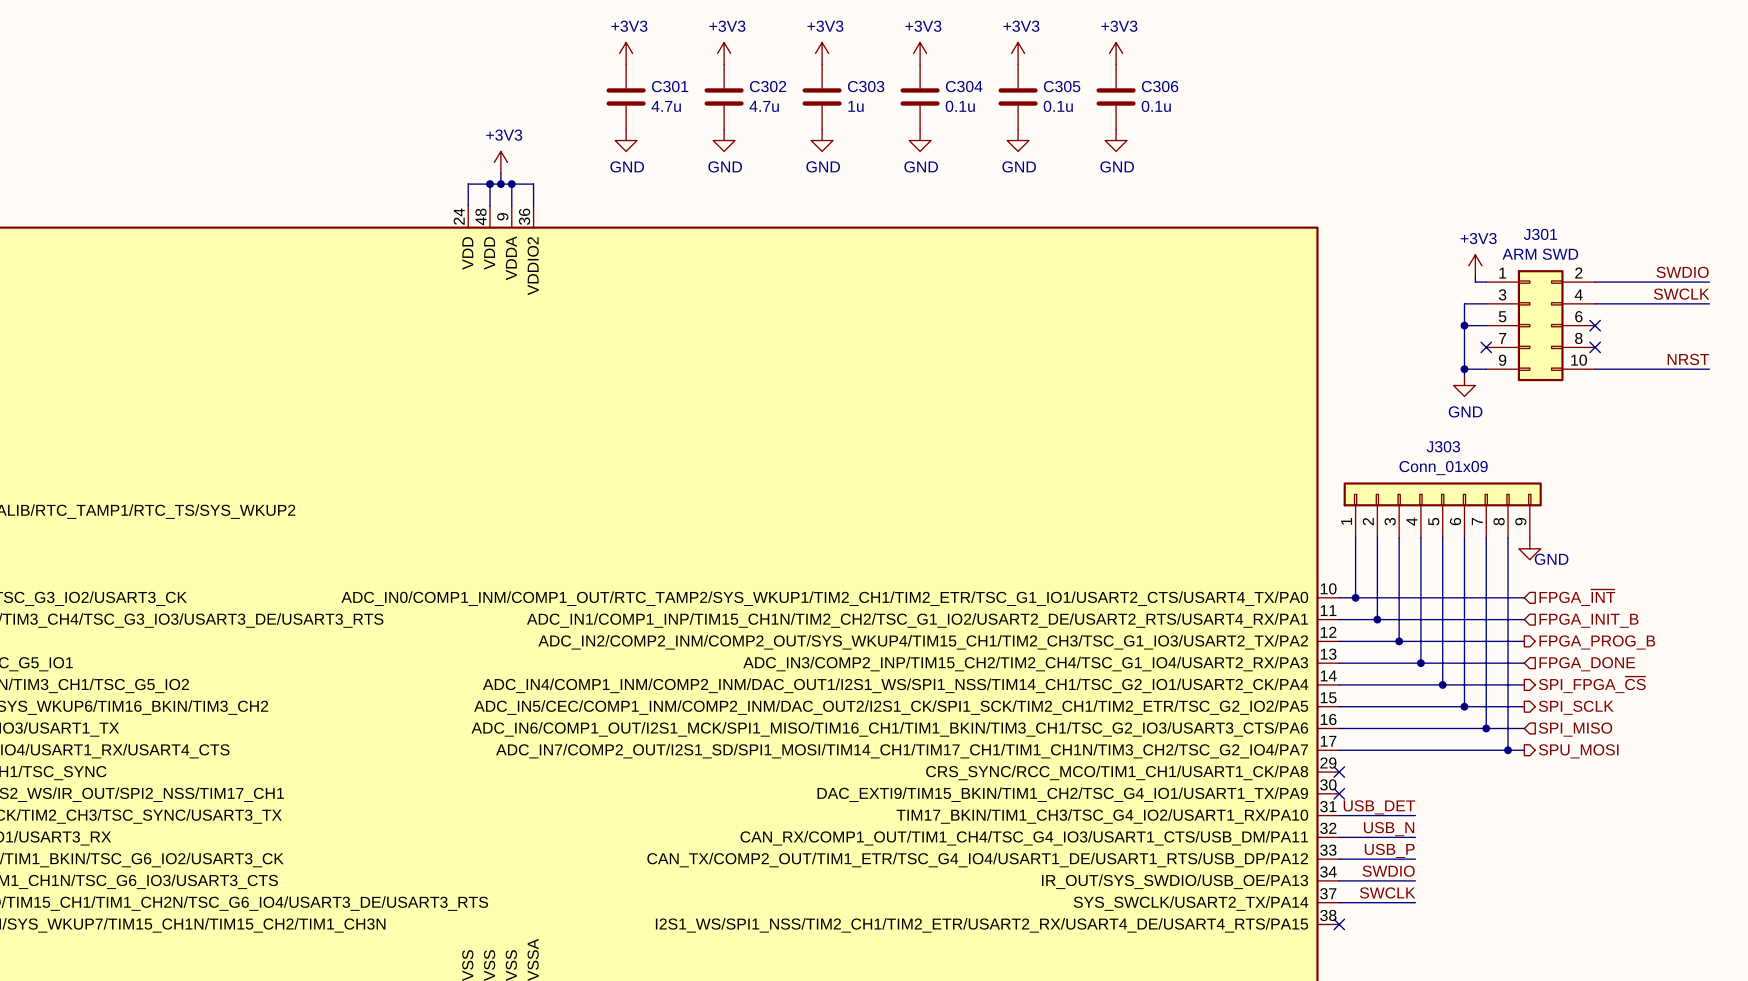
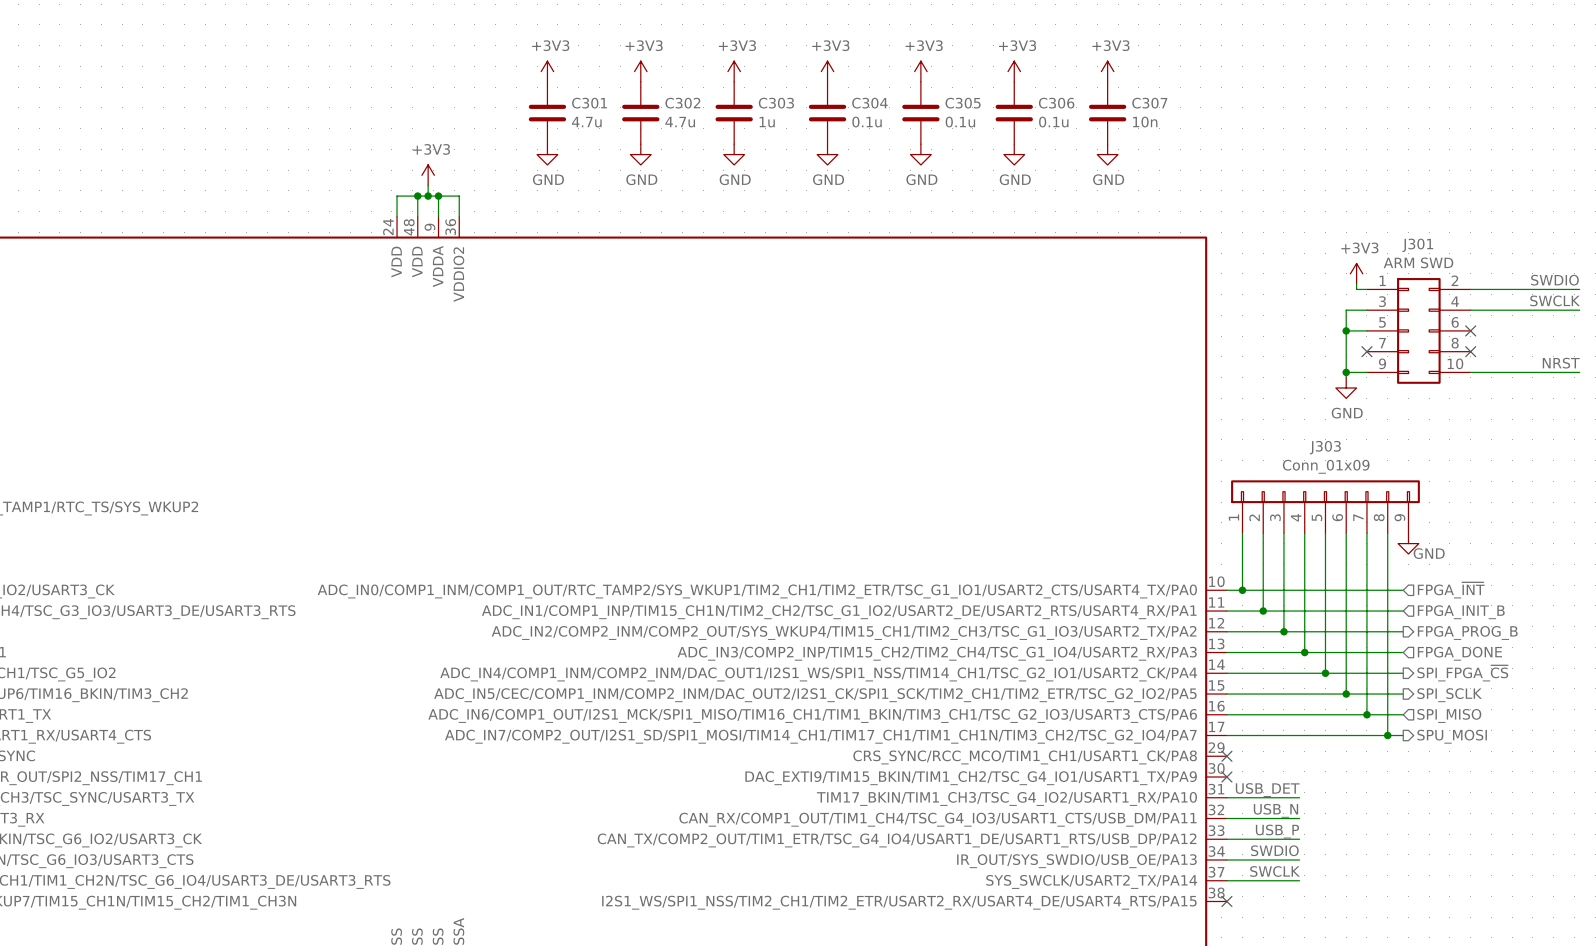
power symbol: none -> +3V3 (1107, 71)
C307: none -> 10n (1107, 113)
power symbol: none -> GND (1107, 154)

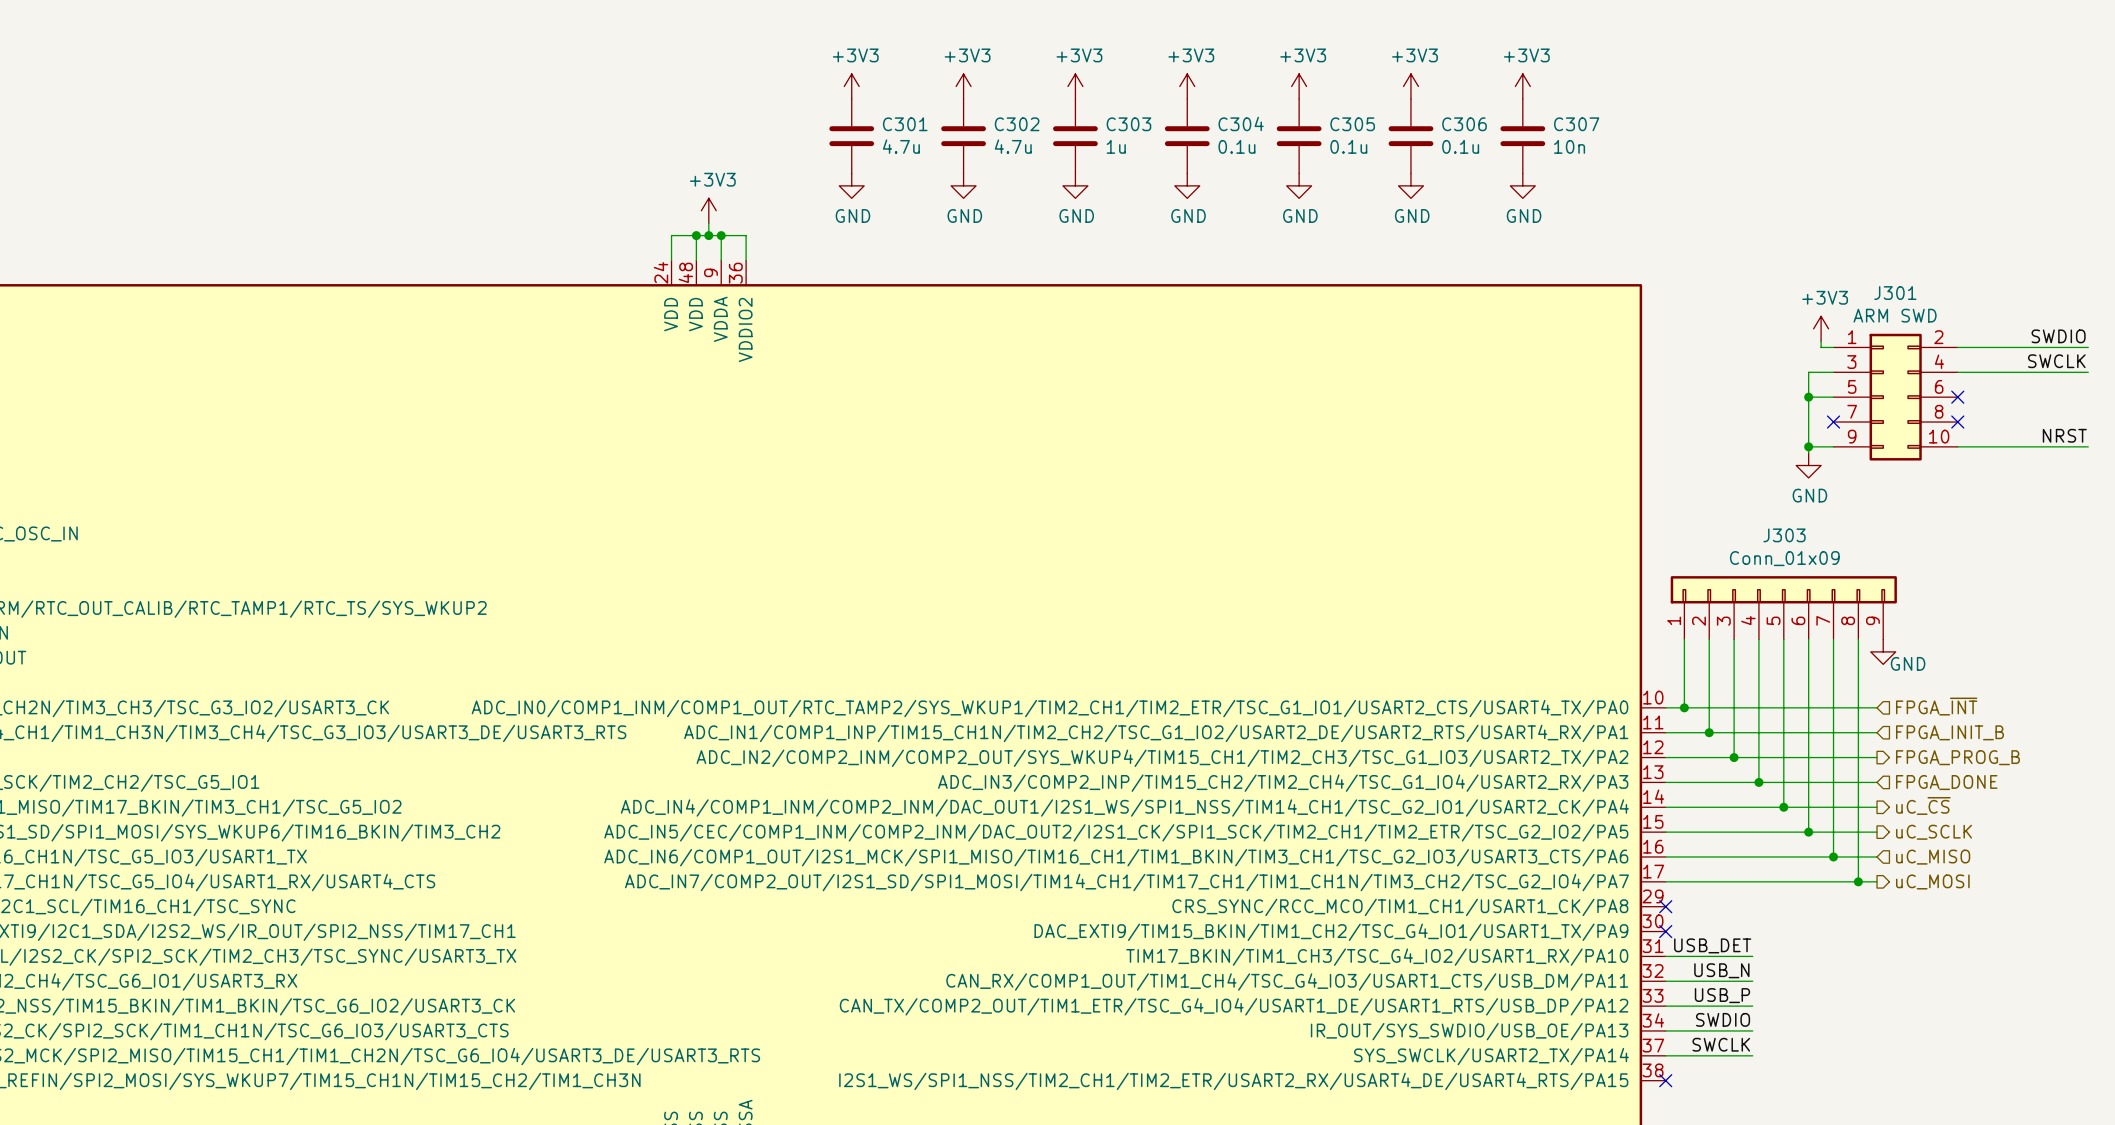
hierarchical label: SPI_FPGA_~{CS} (1462, 673) -> uC_~{CS} (1923, 805)
hierarchical label: SPI_SCLK (1449, 695) -> uC_SCLK (1934, 832)
hierarchical label: SPI_MISO (1449, 715) -> uC_MISO (1933, 857)
hierarchical label: SPU_MOSI (1452, 736) -> uC_MOSI (1932, 881)

